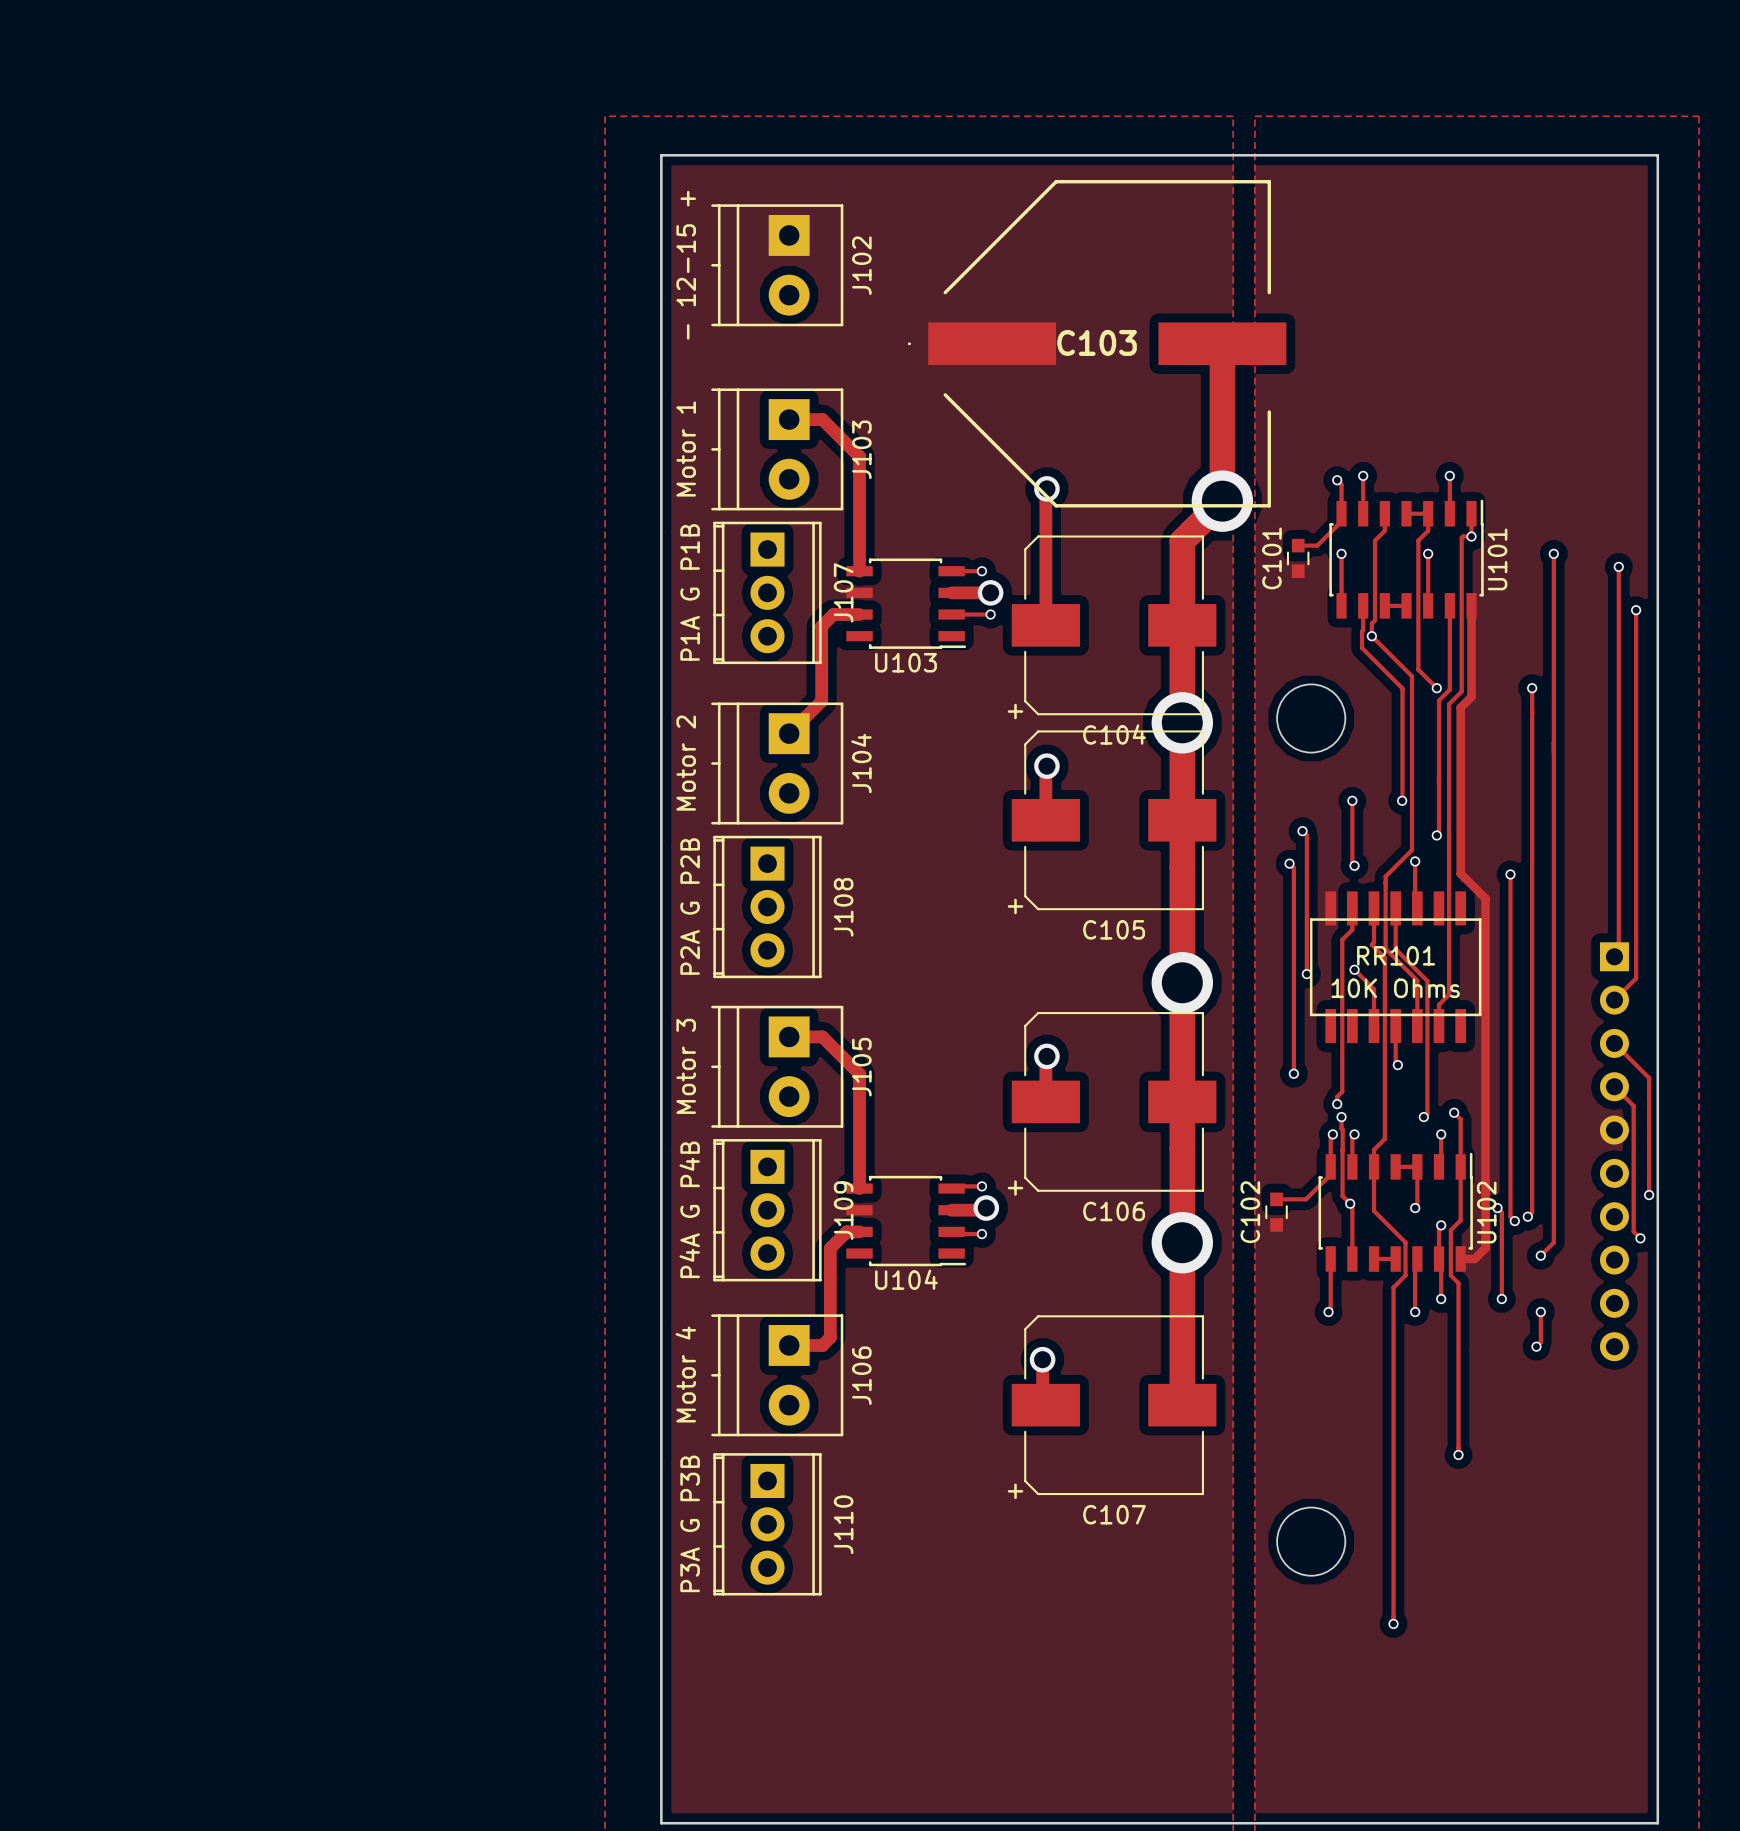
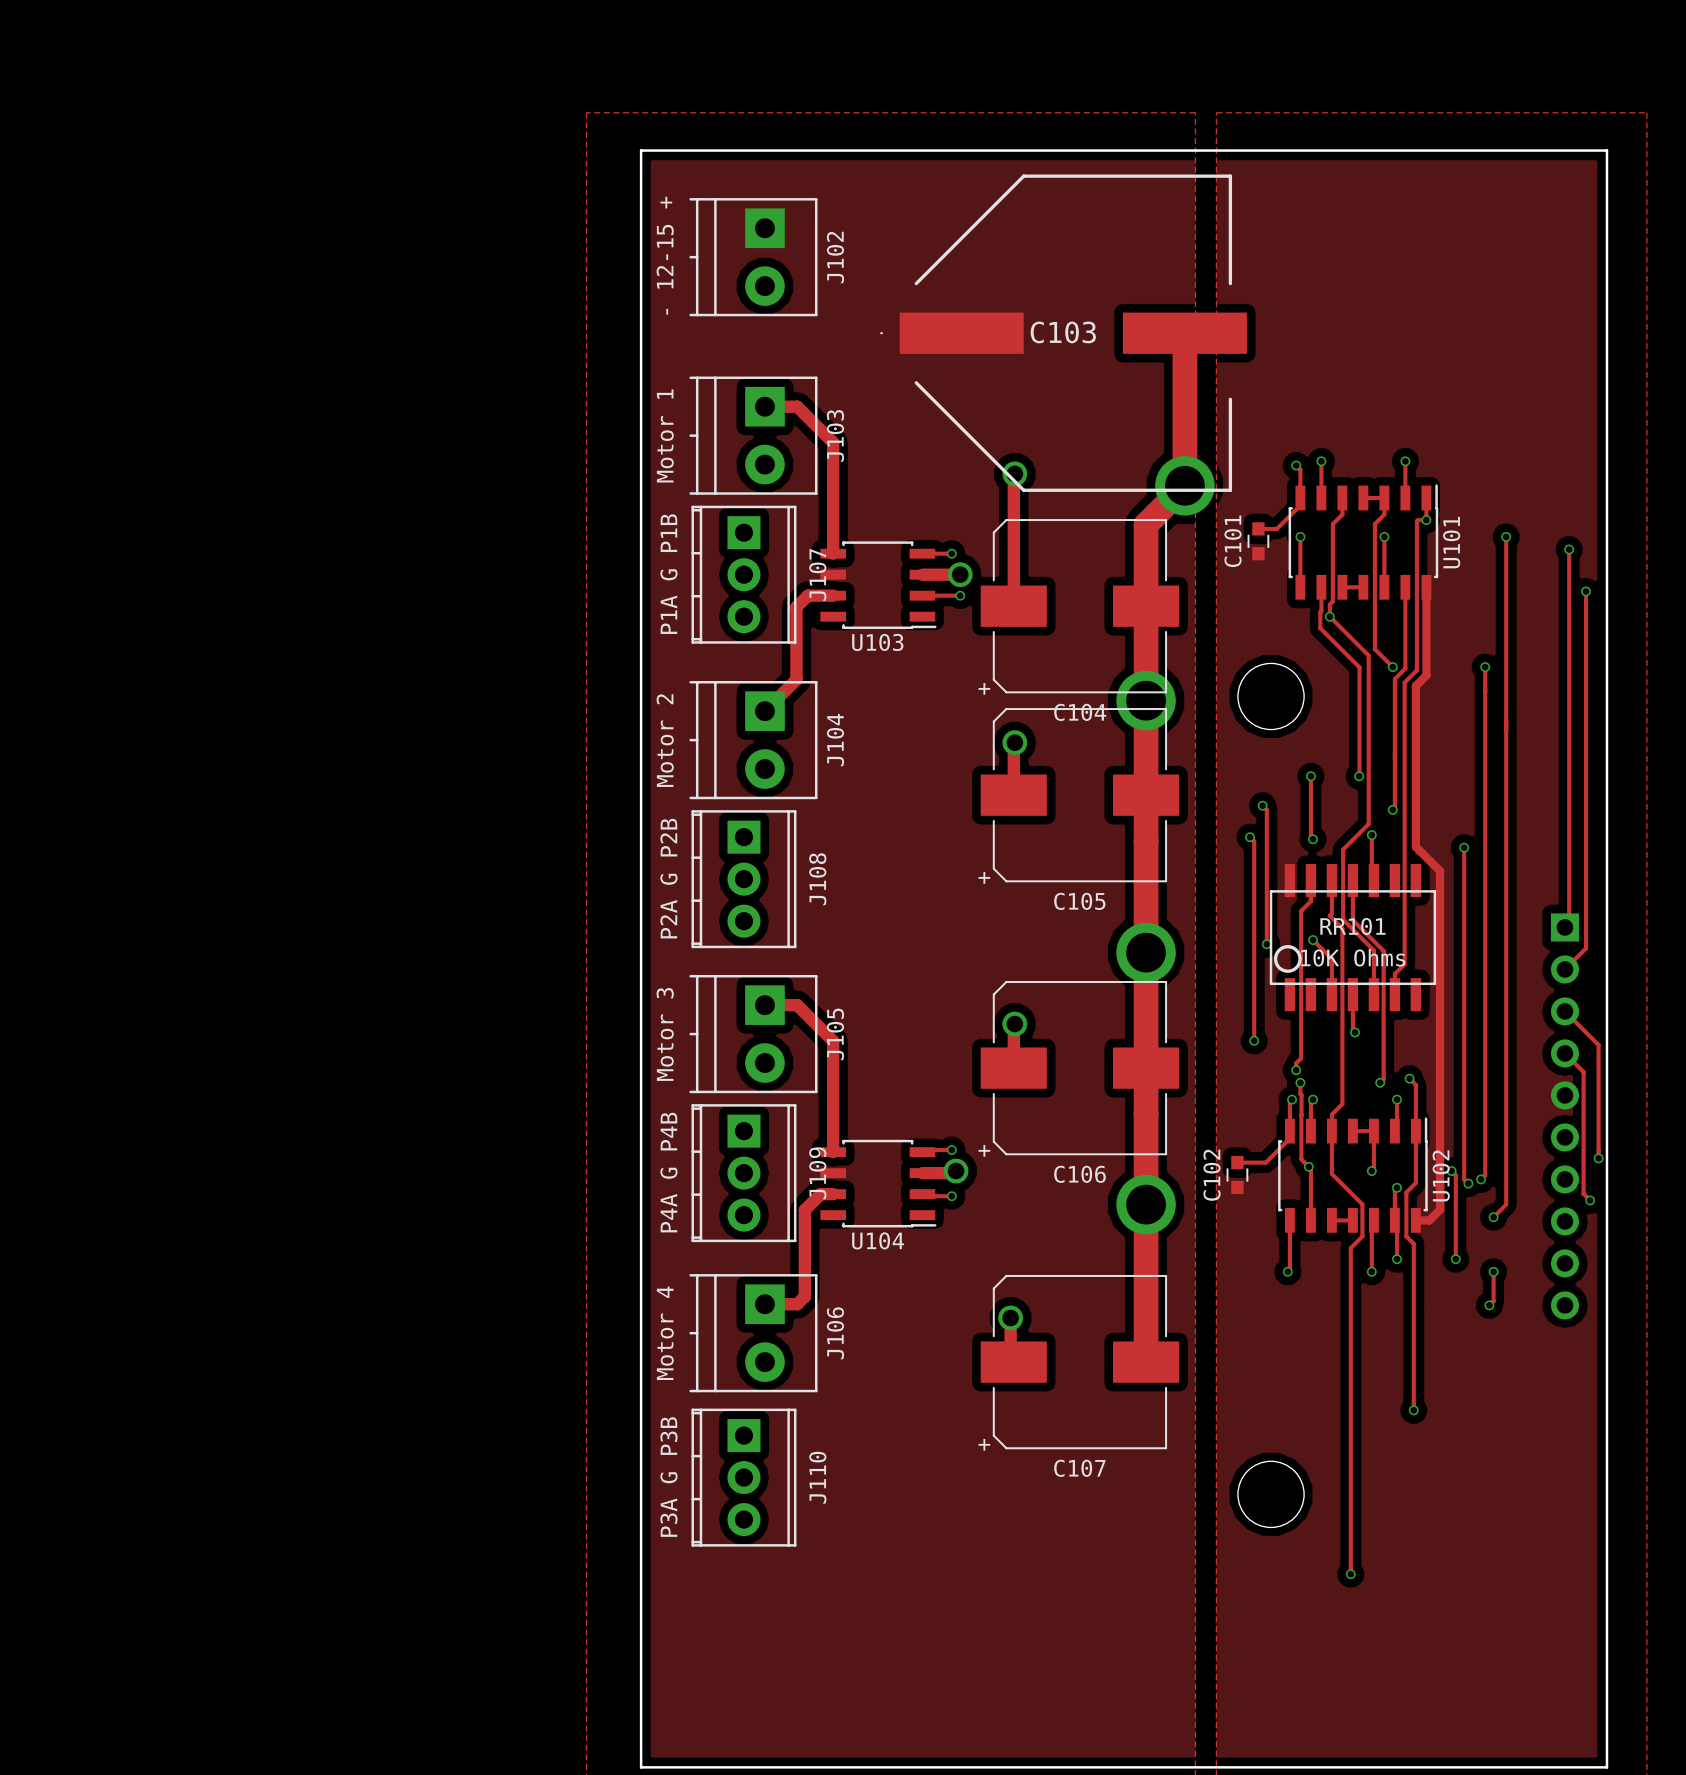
drawing: none -> [1273, 945, 1302, 973]

